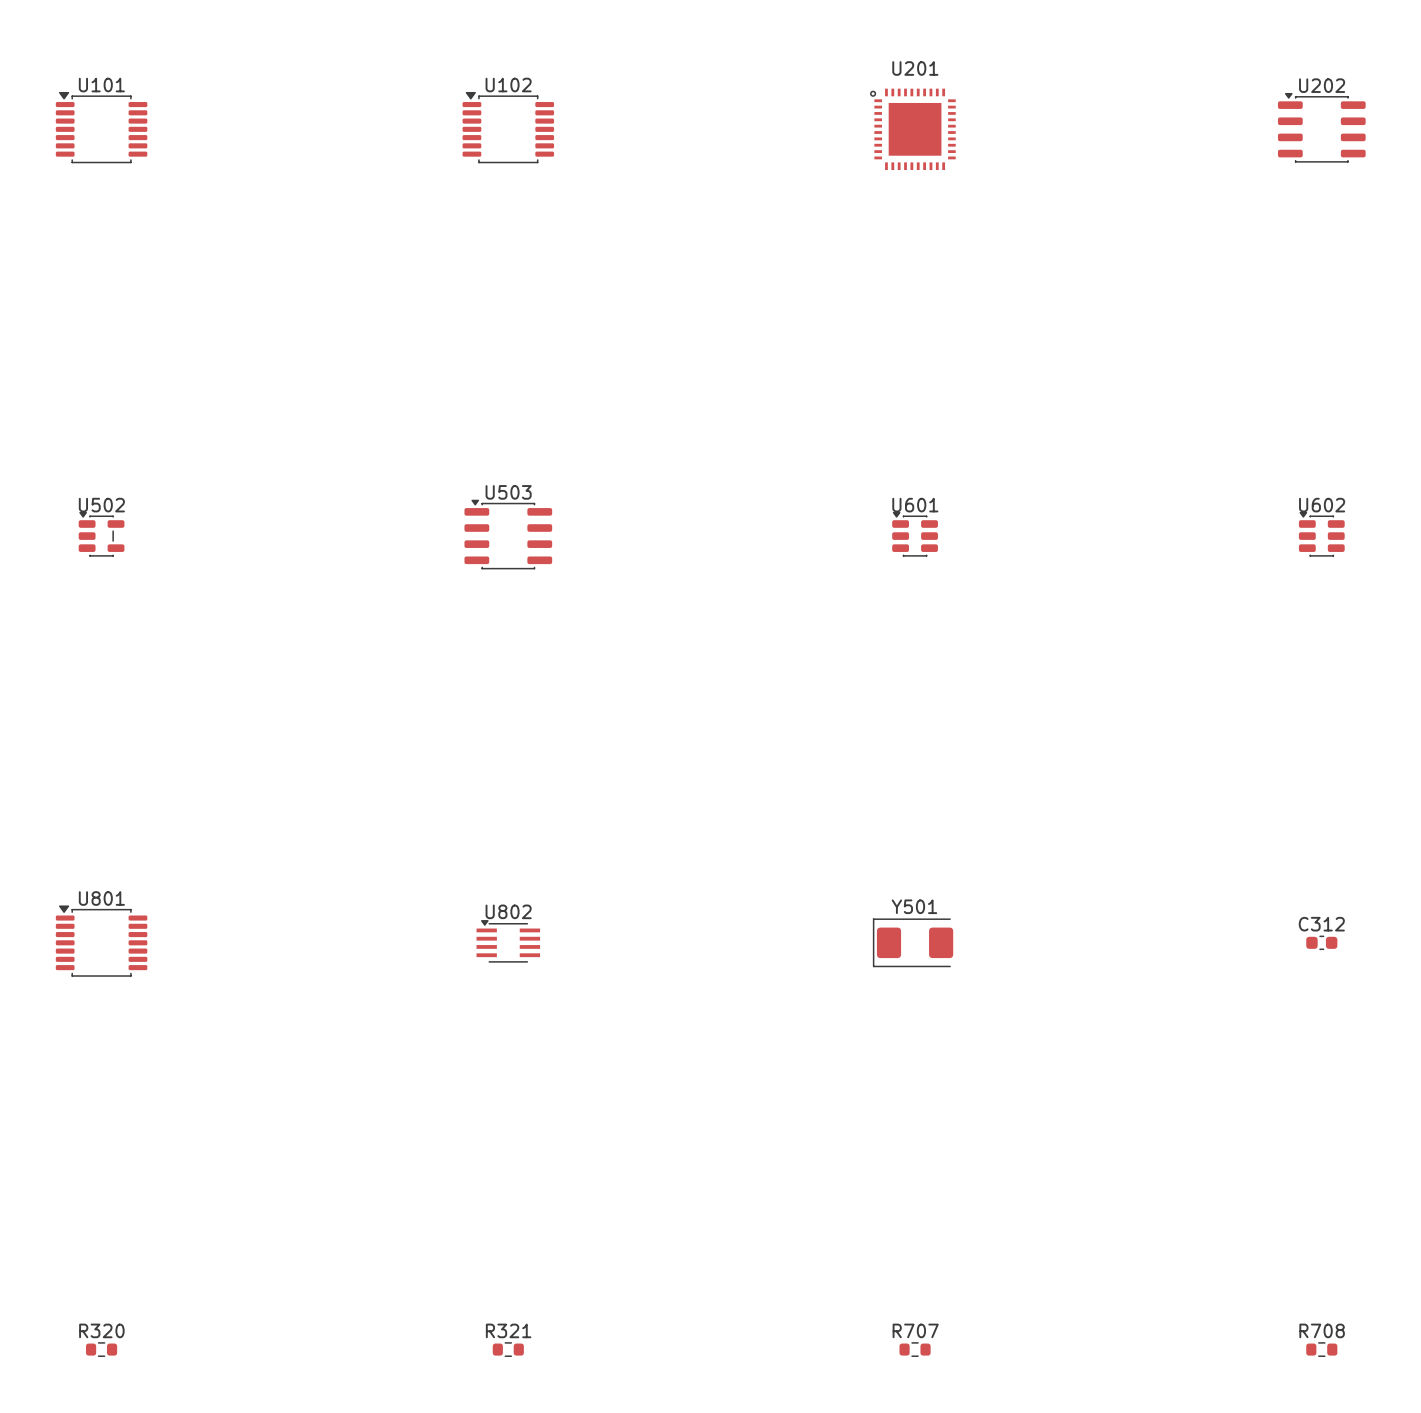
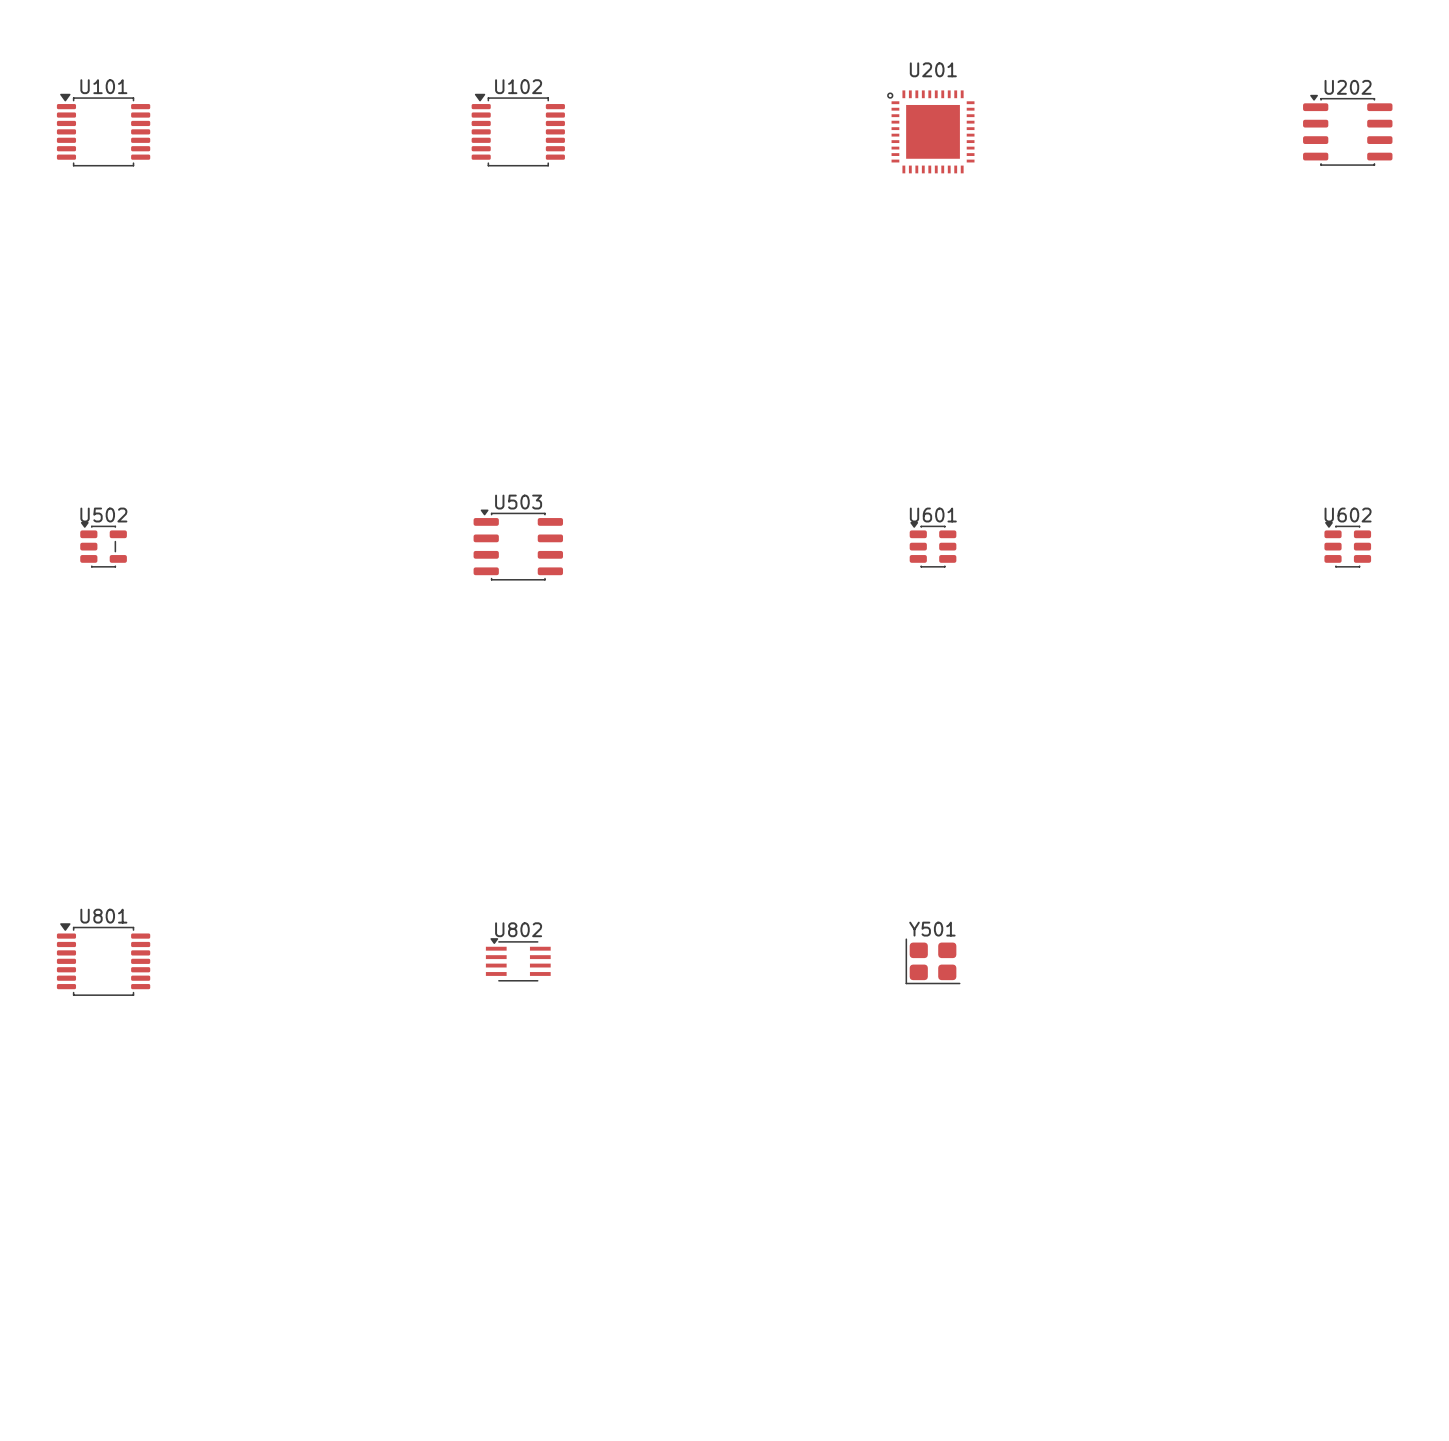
Y501 footprint: [872, 918, 954, 968] -> [905, 938, 961, 985]
C312: (1321, 942) -> none
R320: (101, 1349) -> none
R321: (508, 1349) -> none
R707: (915, 1349) -> none
R708: (1321, 1349) -> none

